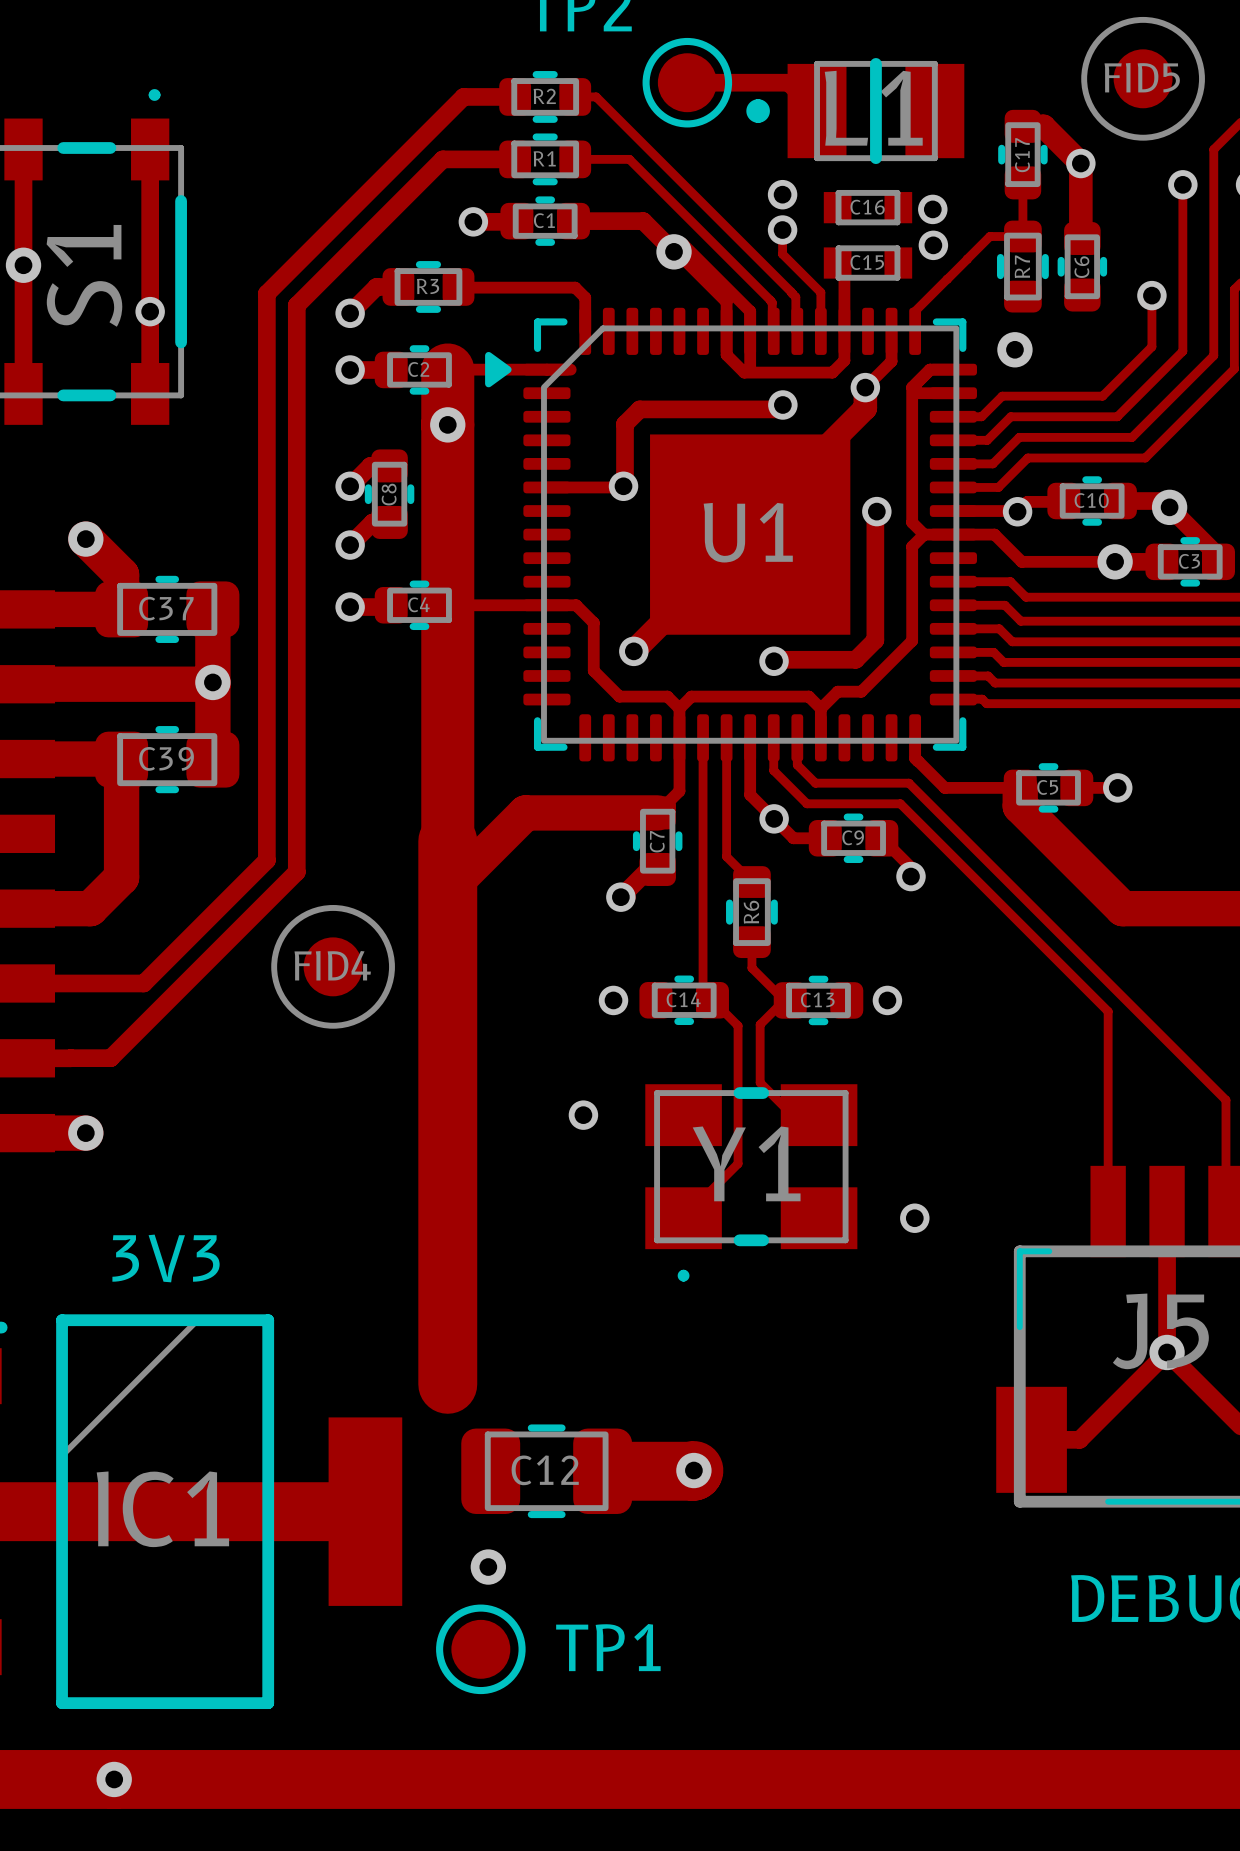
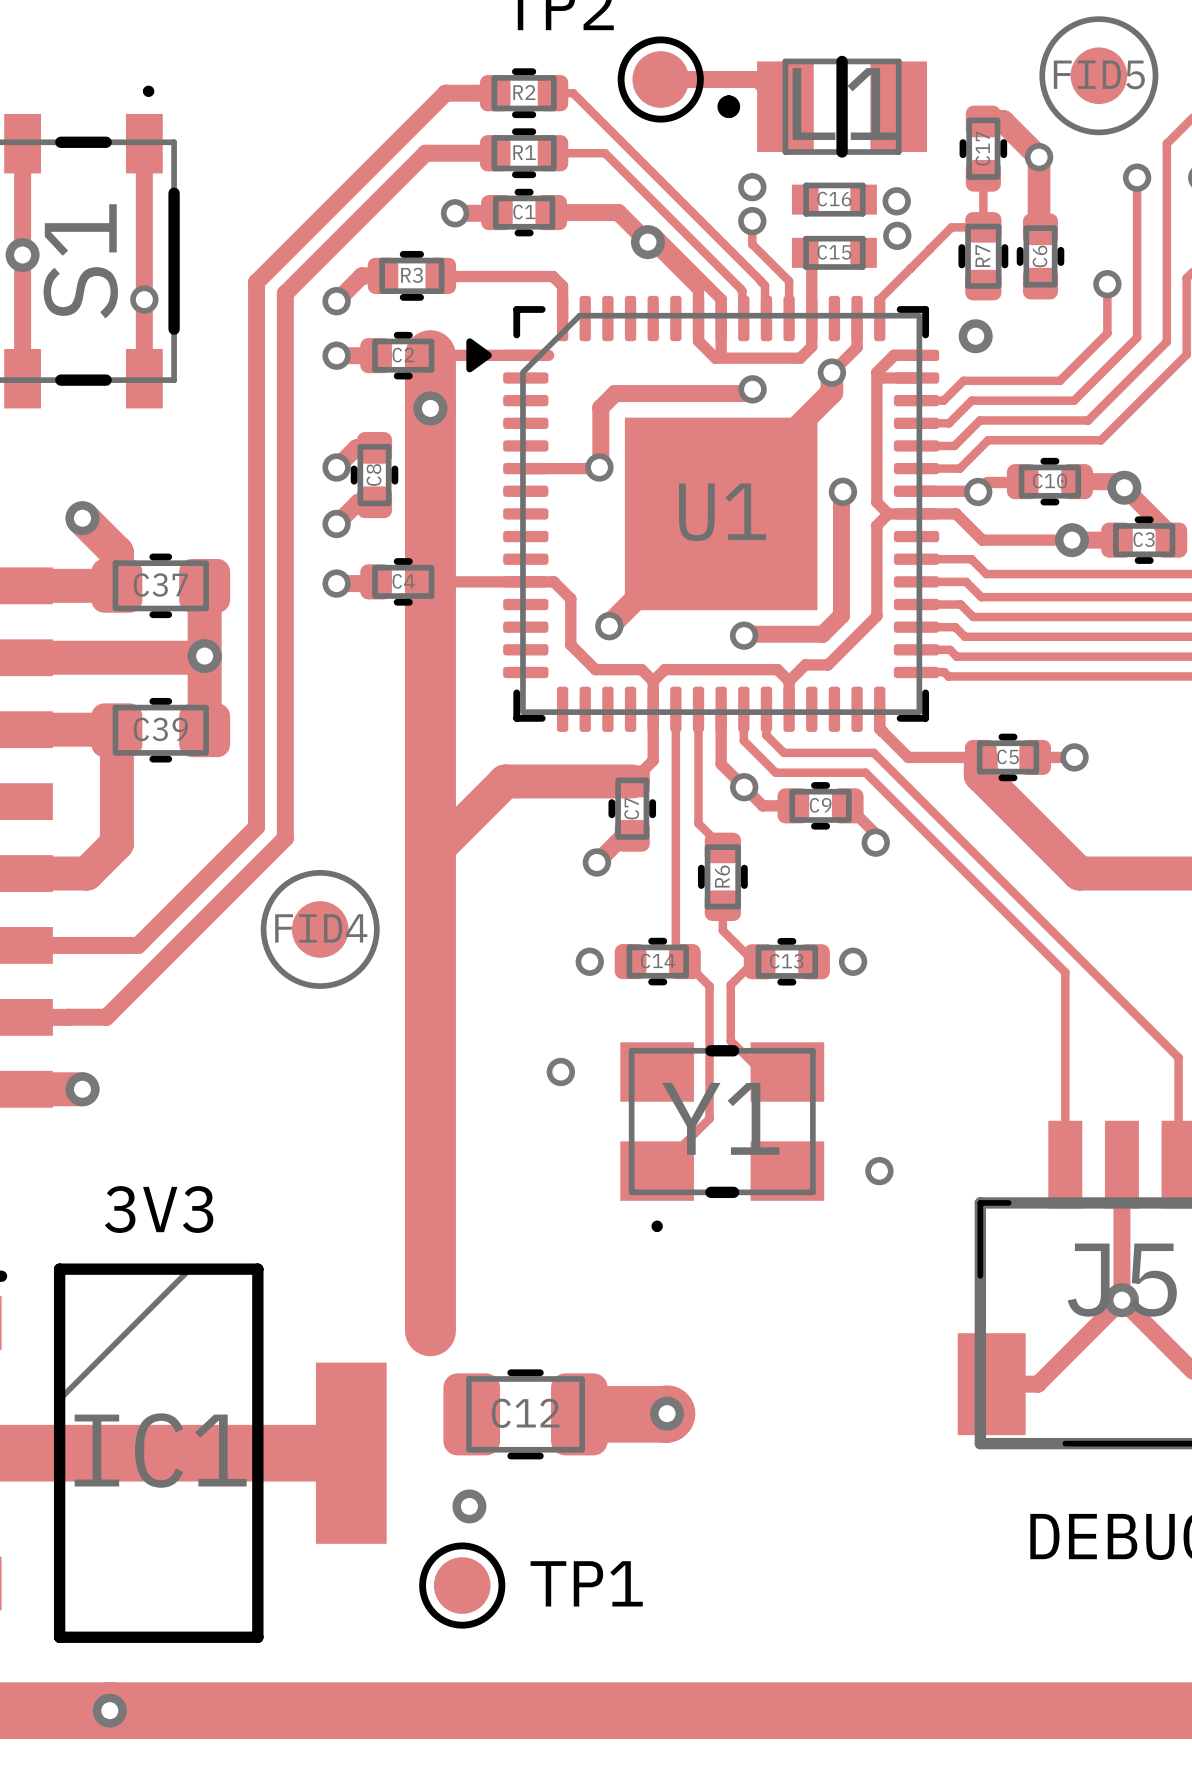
track width: thick (447, 841) (447, 1384) -> thin (430, 808) (430, 1330)

